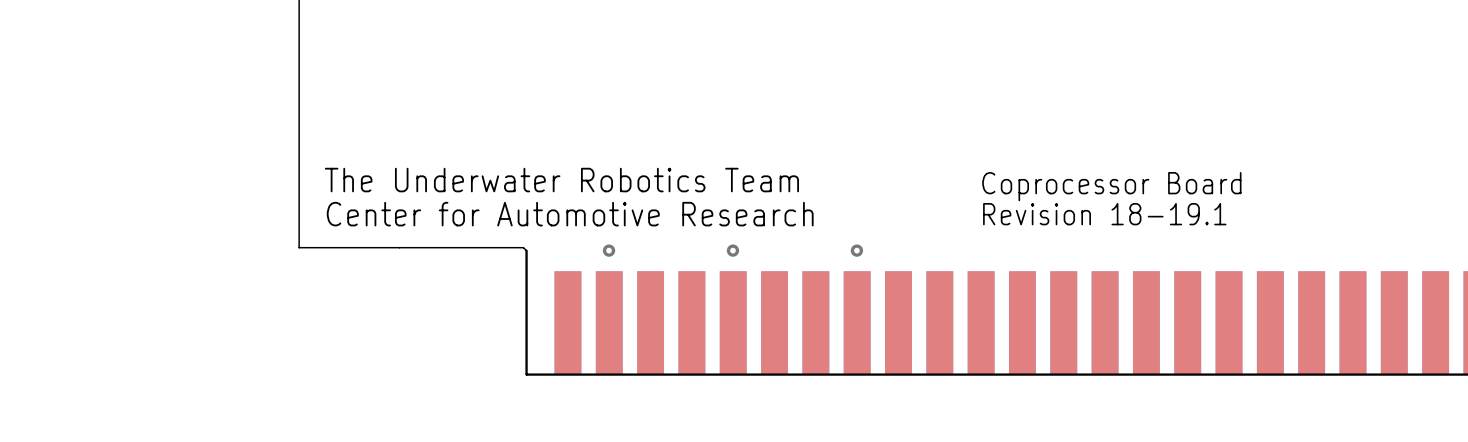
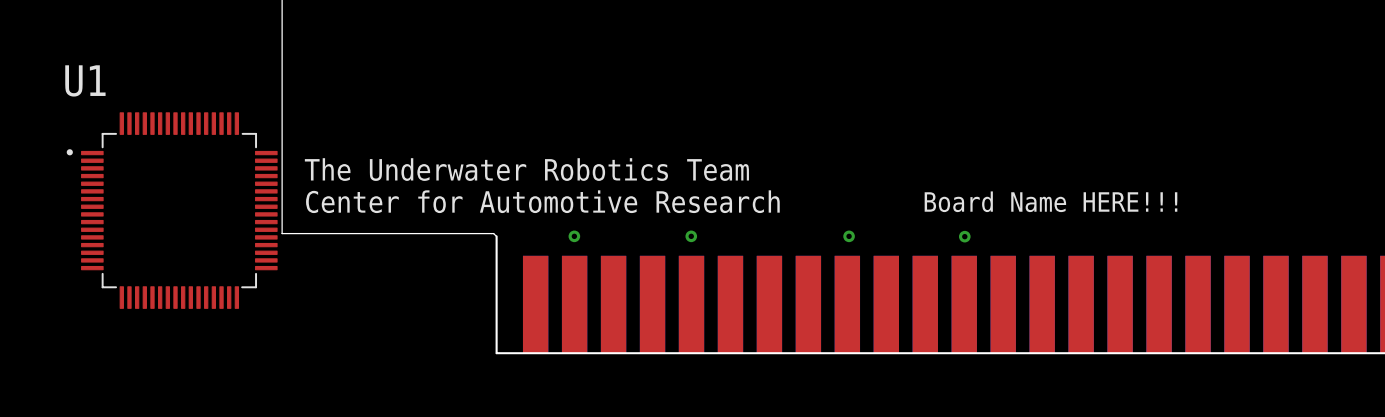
text: Coprocessor Board (1111, 186) -> none
text: Revision 18-19.1 (1104, 214) -> Board Name HERE!!! (1050, 201)
U1: none -> (172, 210)
via position: (856, 250) -> (849, 236)
via: none -> (964, 236)

